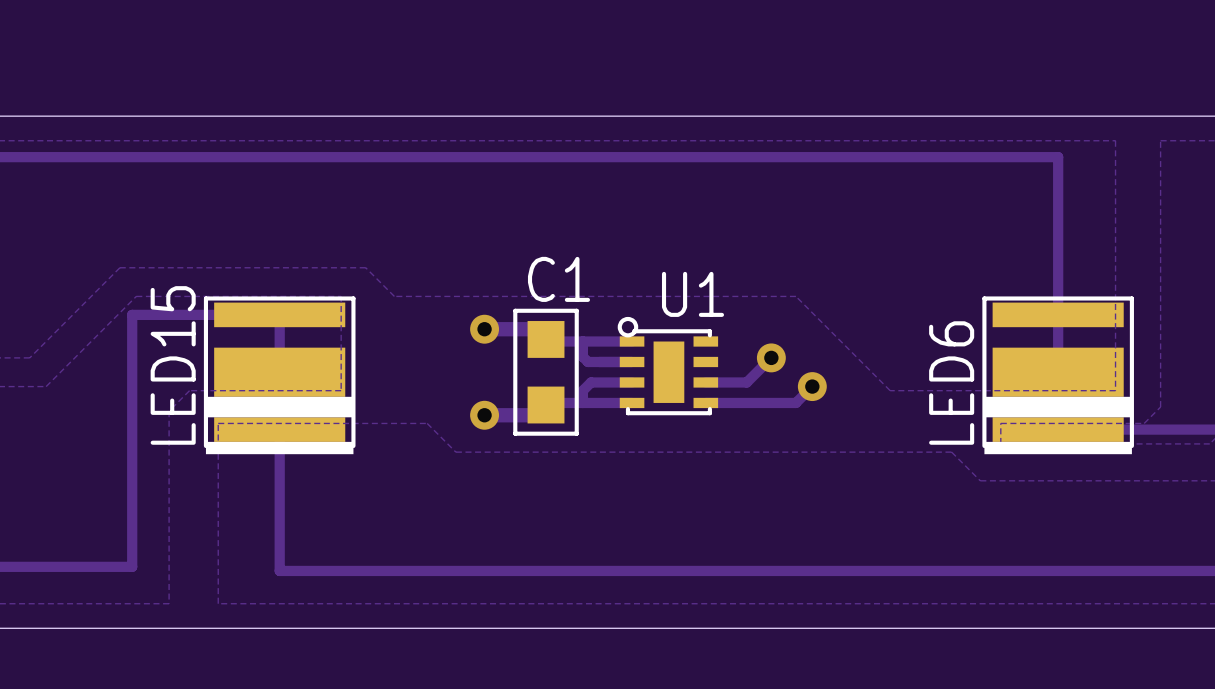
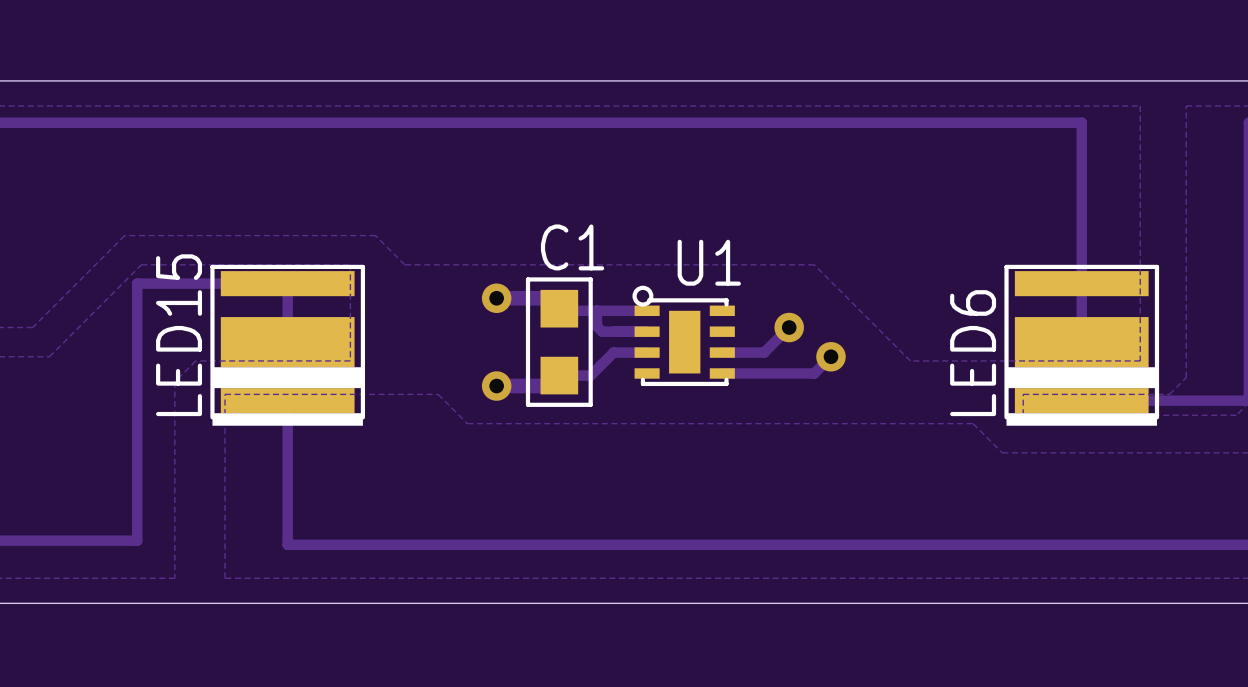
track: (599, 382) (591, 382) (582, 390) (582, 402) -> (613, 352) (590, 375) (559, 375)
track: (632, 402) (548, 402) (546, 405) -> none

